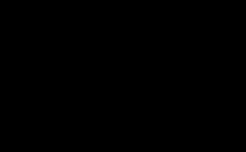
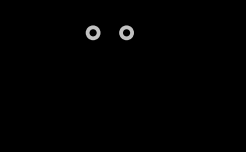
via: none -> (93, 32)
via: none -> (126, 32)

